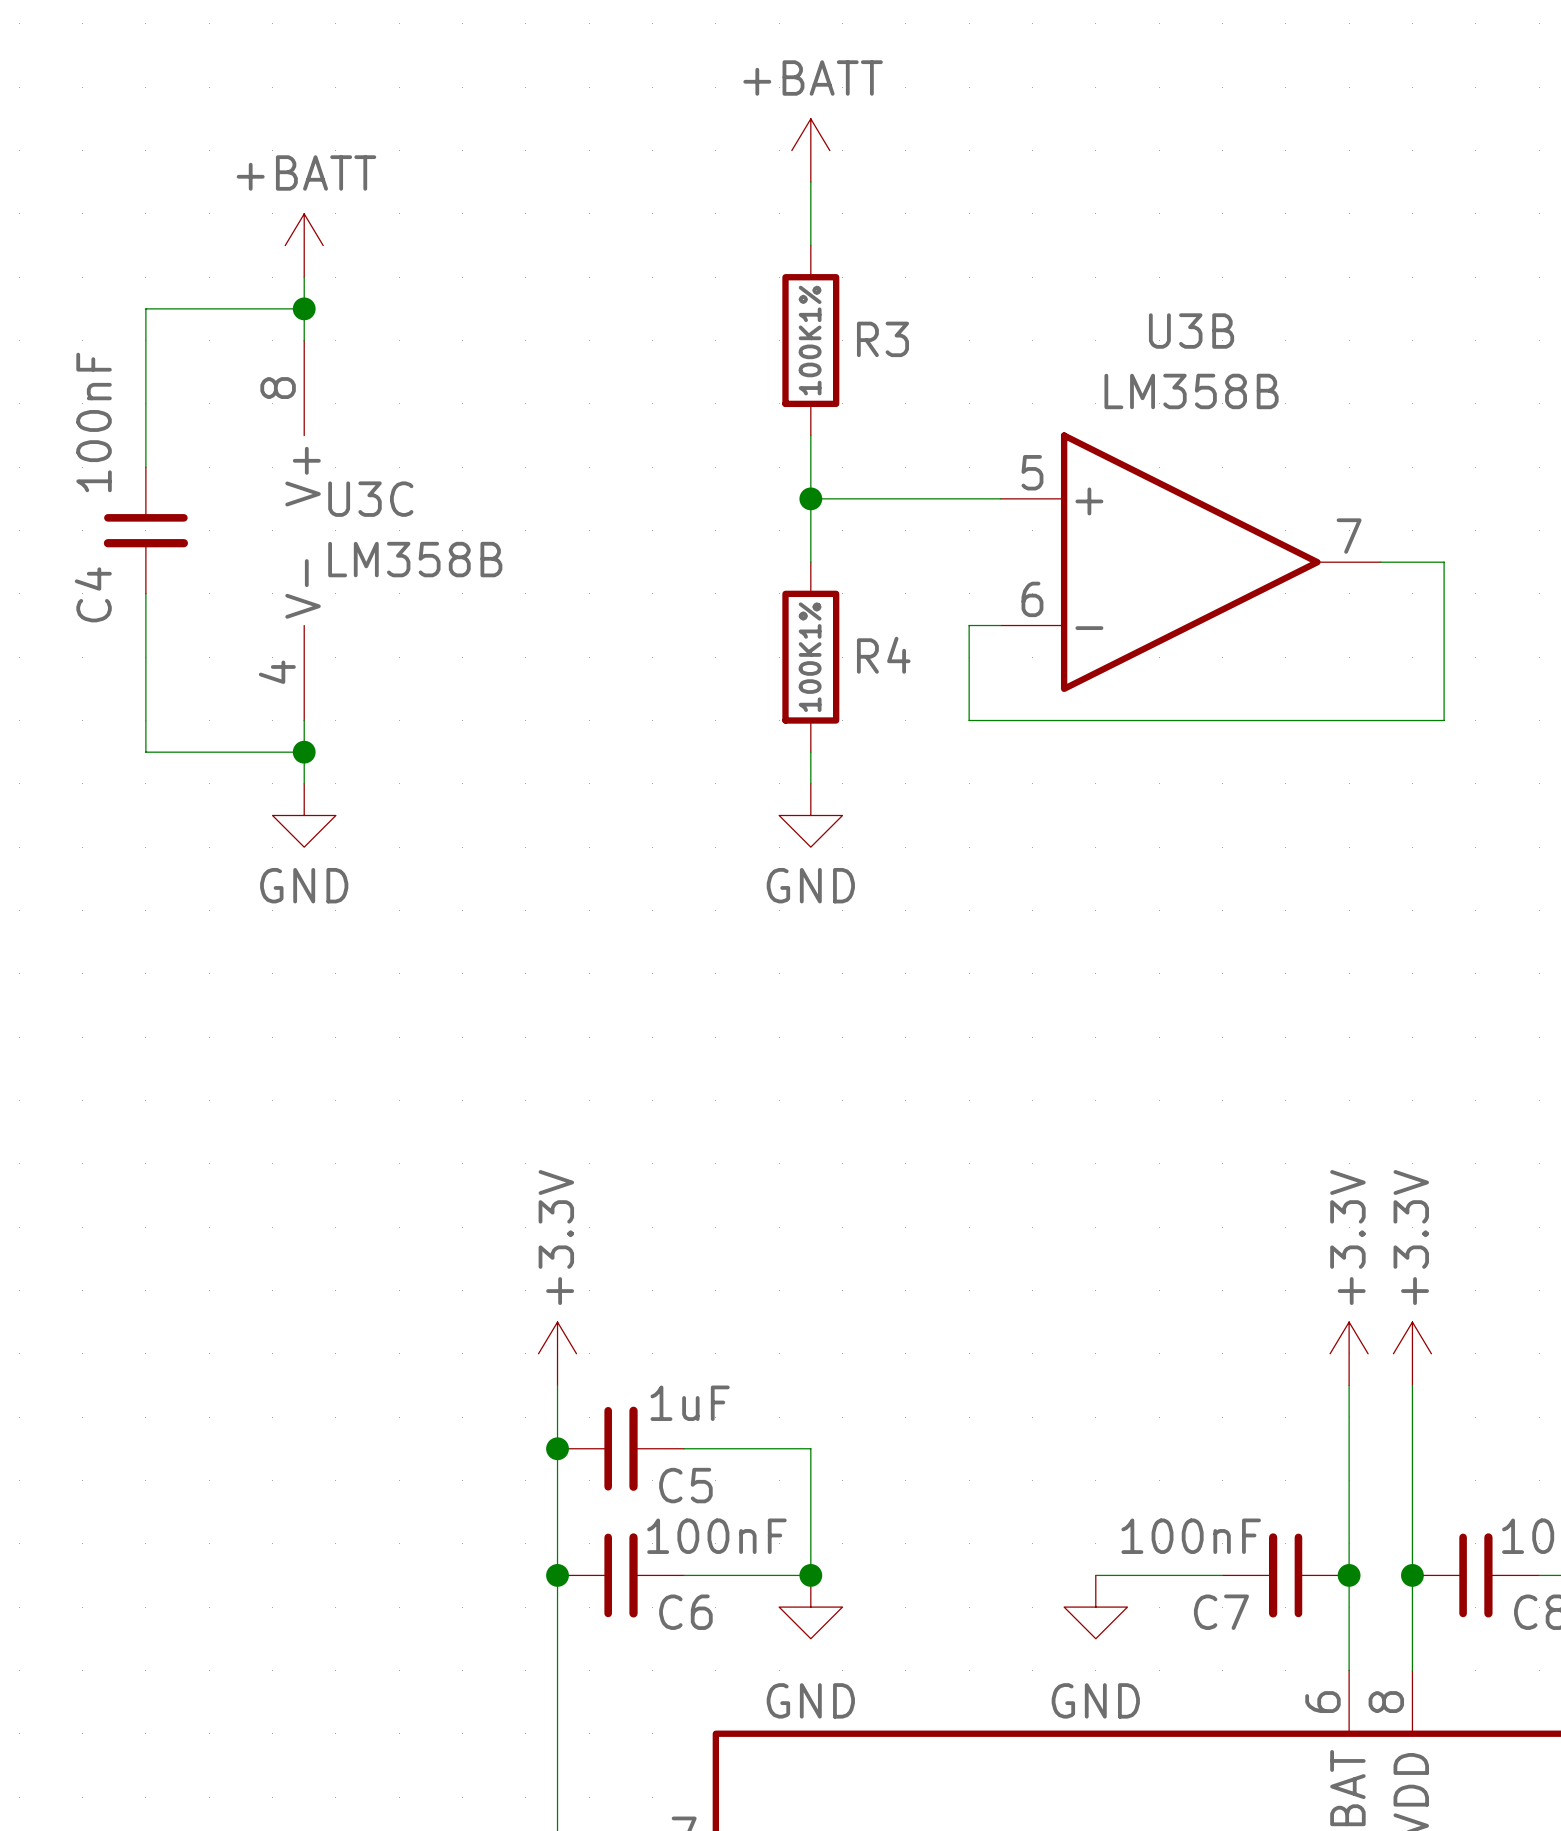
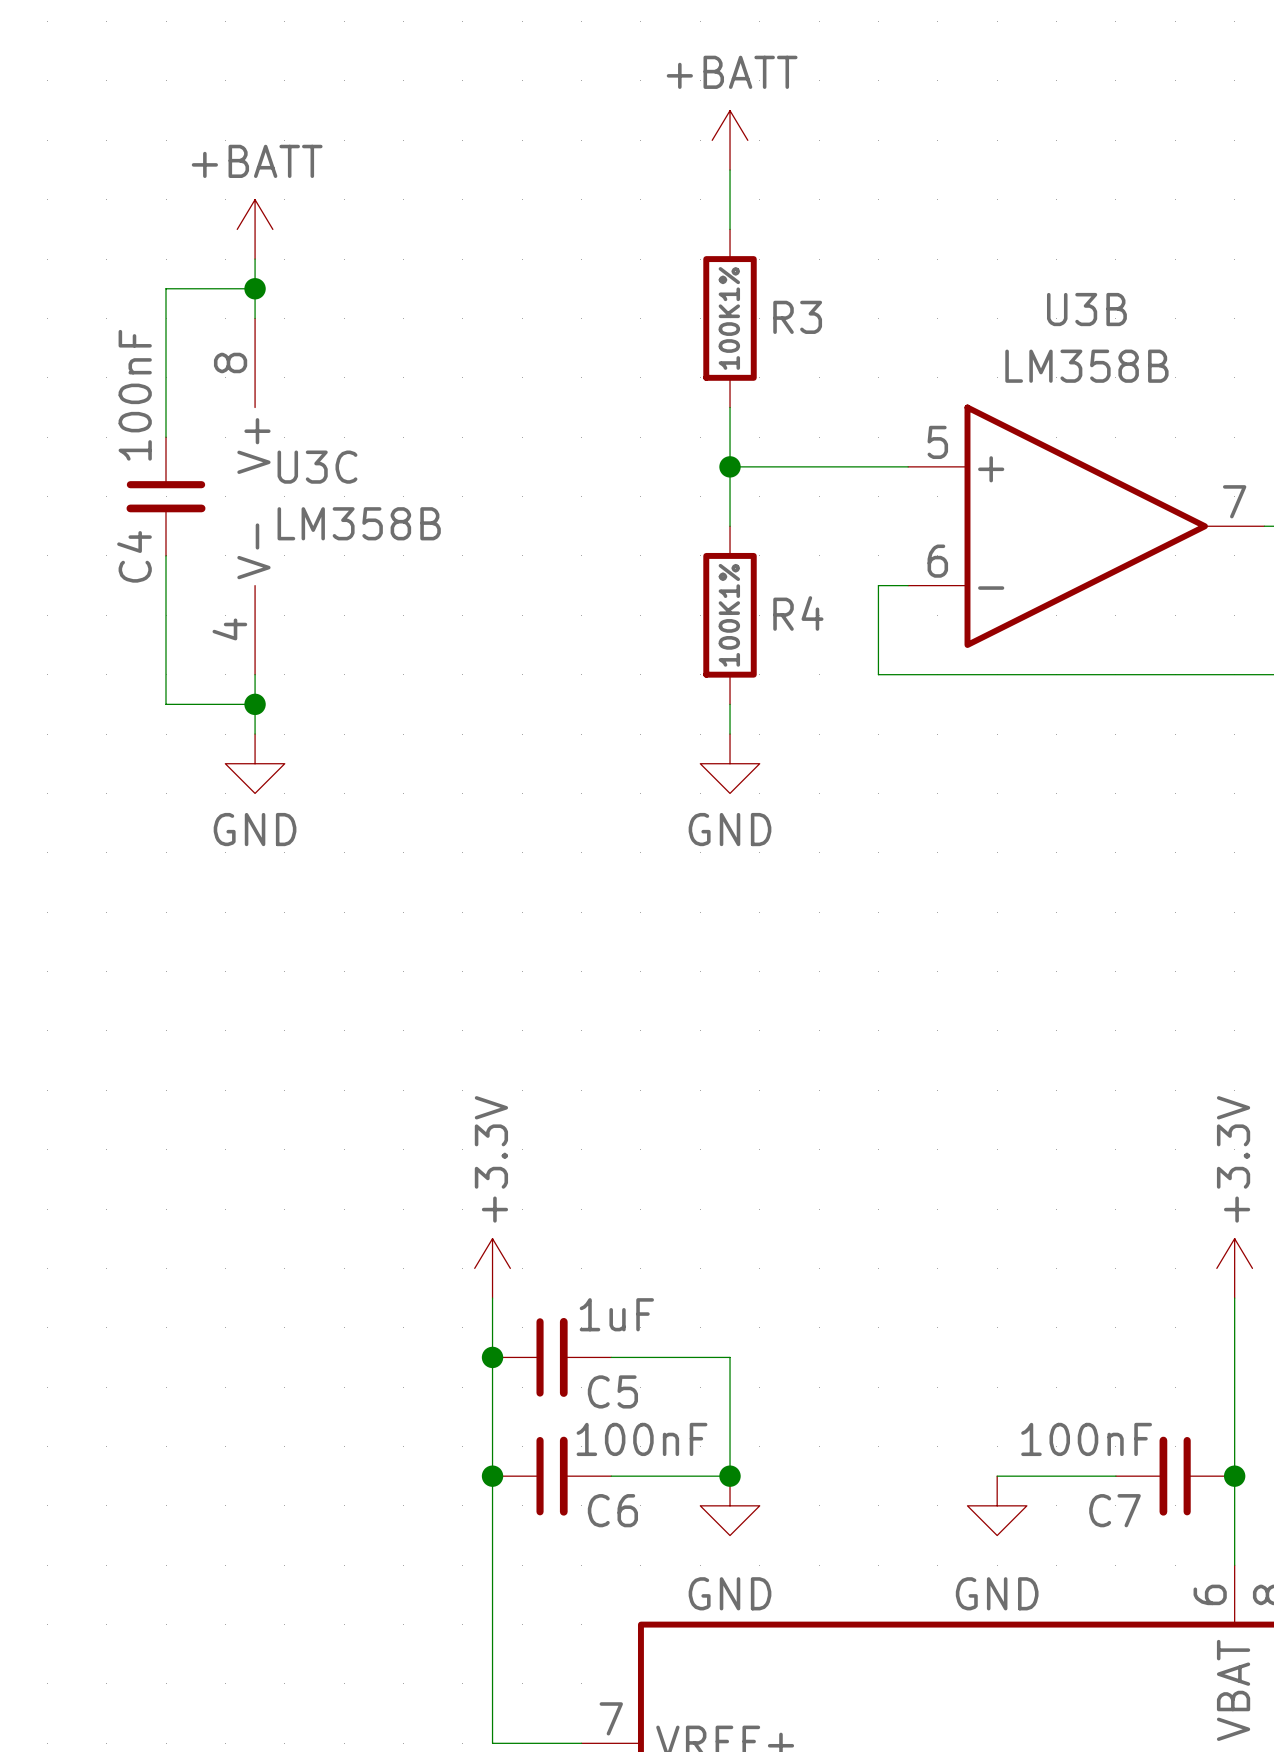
wire: (209, 308) (145, 308) (145, 467) -> (166, 288) (166, 437)
C4 value position: 100nF (94, 422) -> 100nF (135, 395)
C4 position: (145, 530) -> (166, 496)
wire: (145, 593) (145, 752) (209, 752) -> (166, 555) (166, 704)
C4 name position: C4 (93, 594) -> C4 (134, 556)

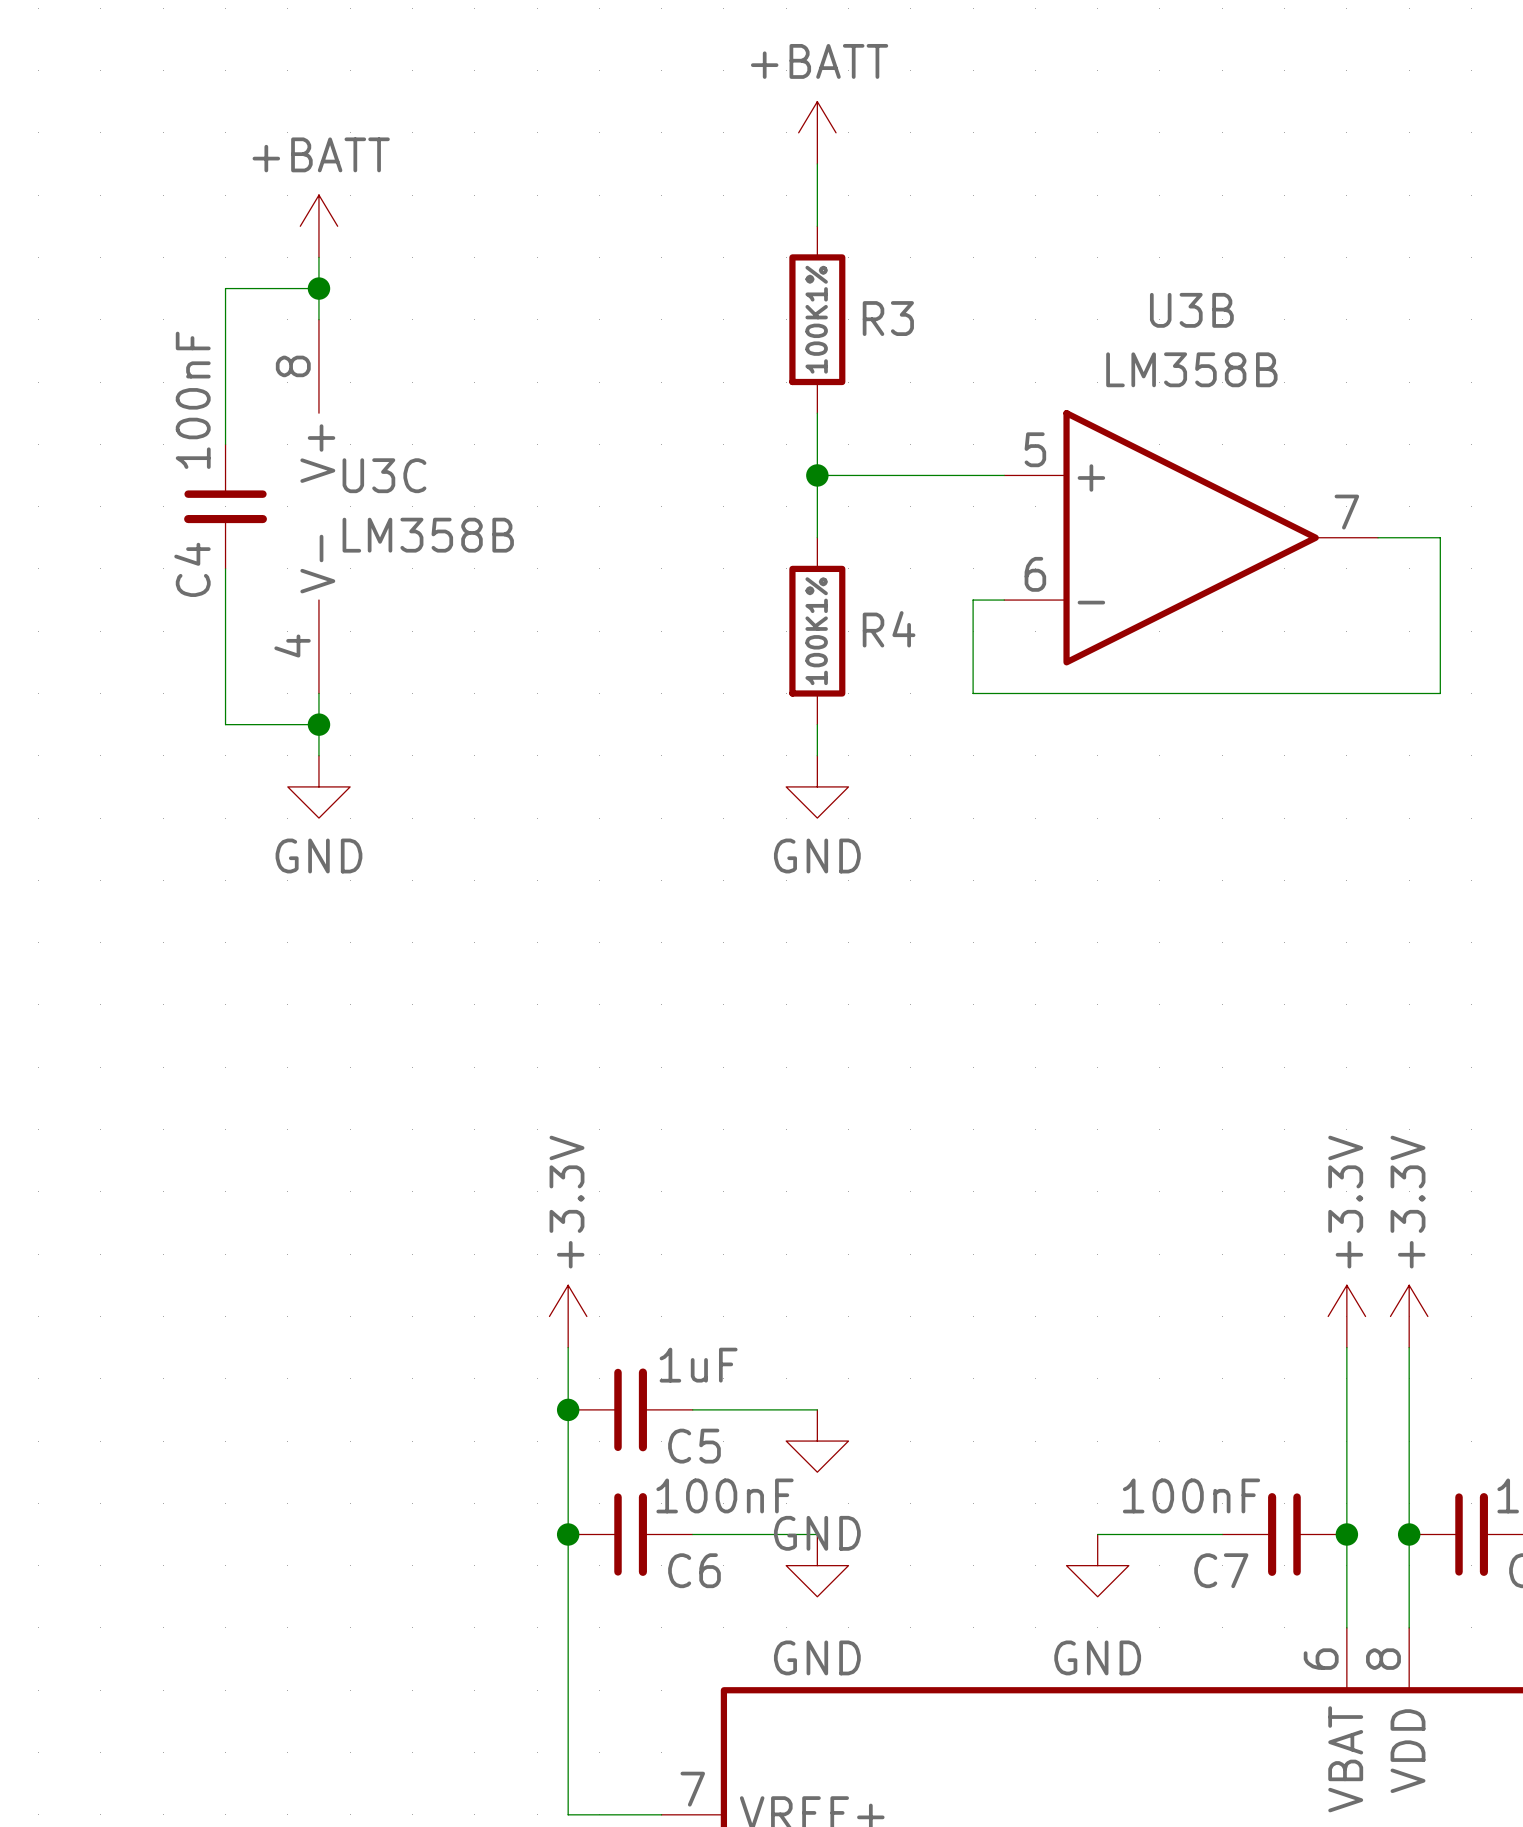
wire: (730, 1357) (730, 1476) -> none
power symbol: none -> GND (817, 1441)
junction: (730, 1476) -> none

